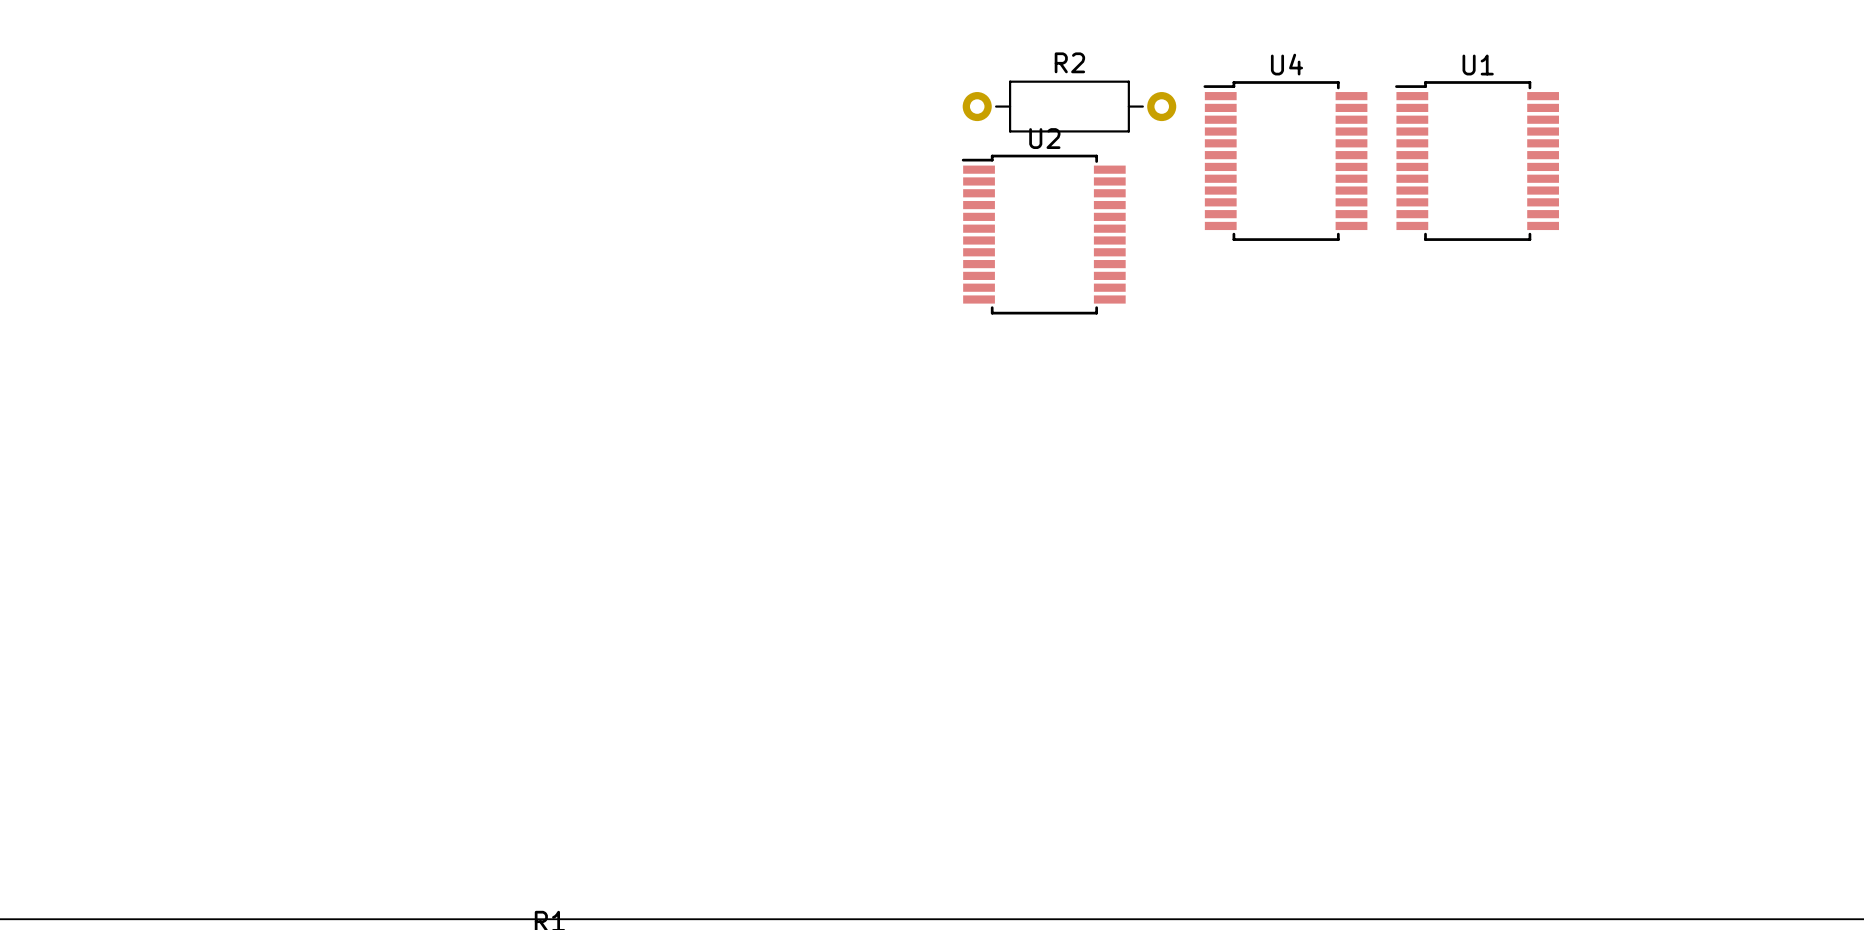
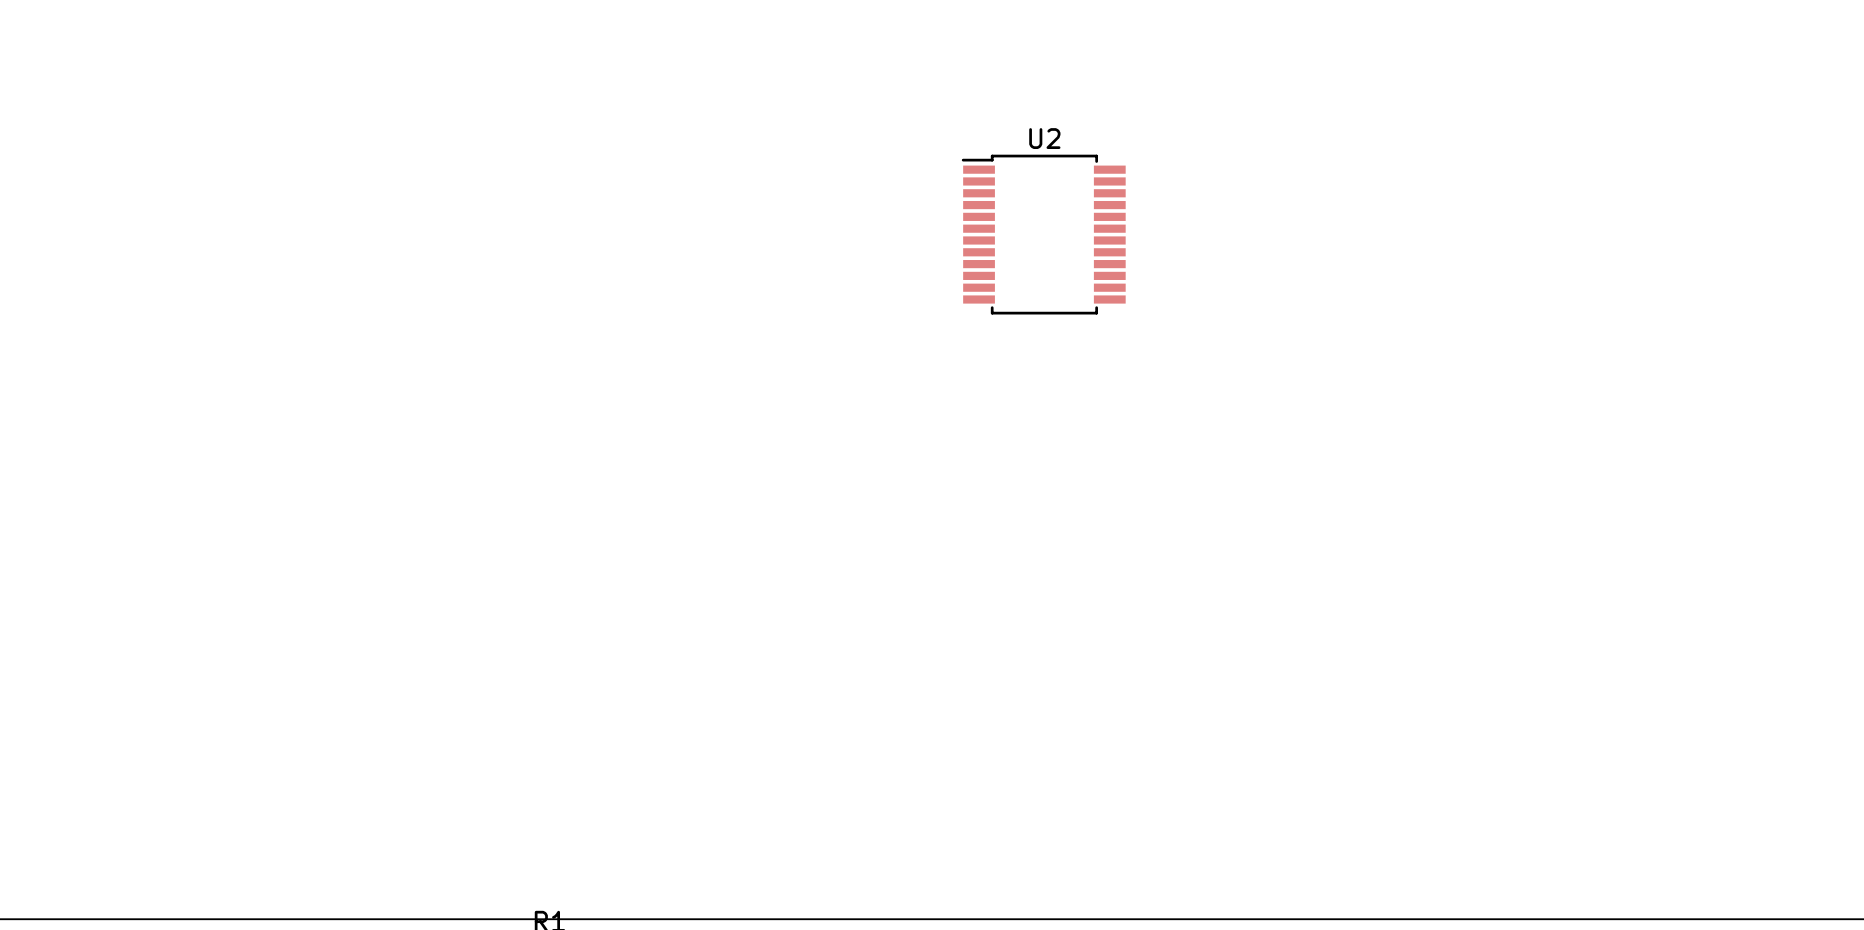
R2: (1069, 106) -> none
U4: (1285, 161) -> none
U1: (1477, 161) -> none

